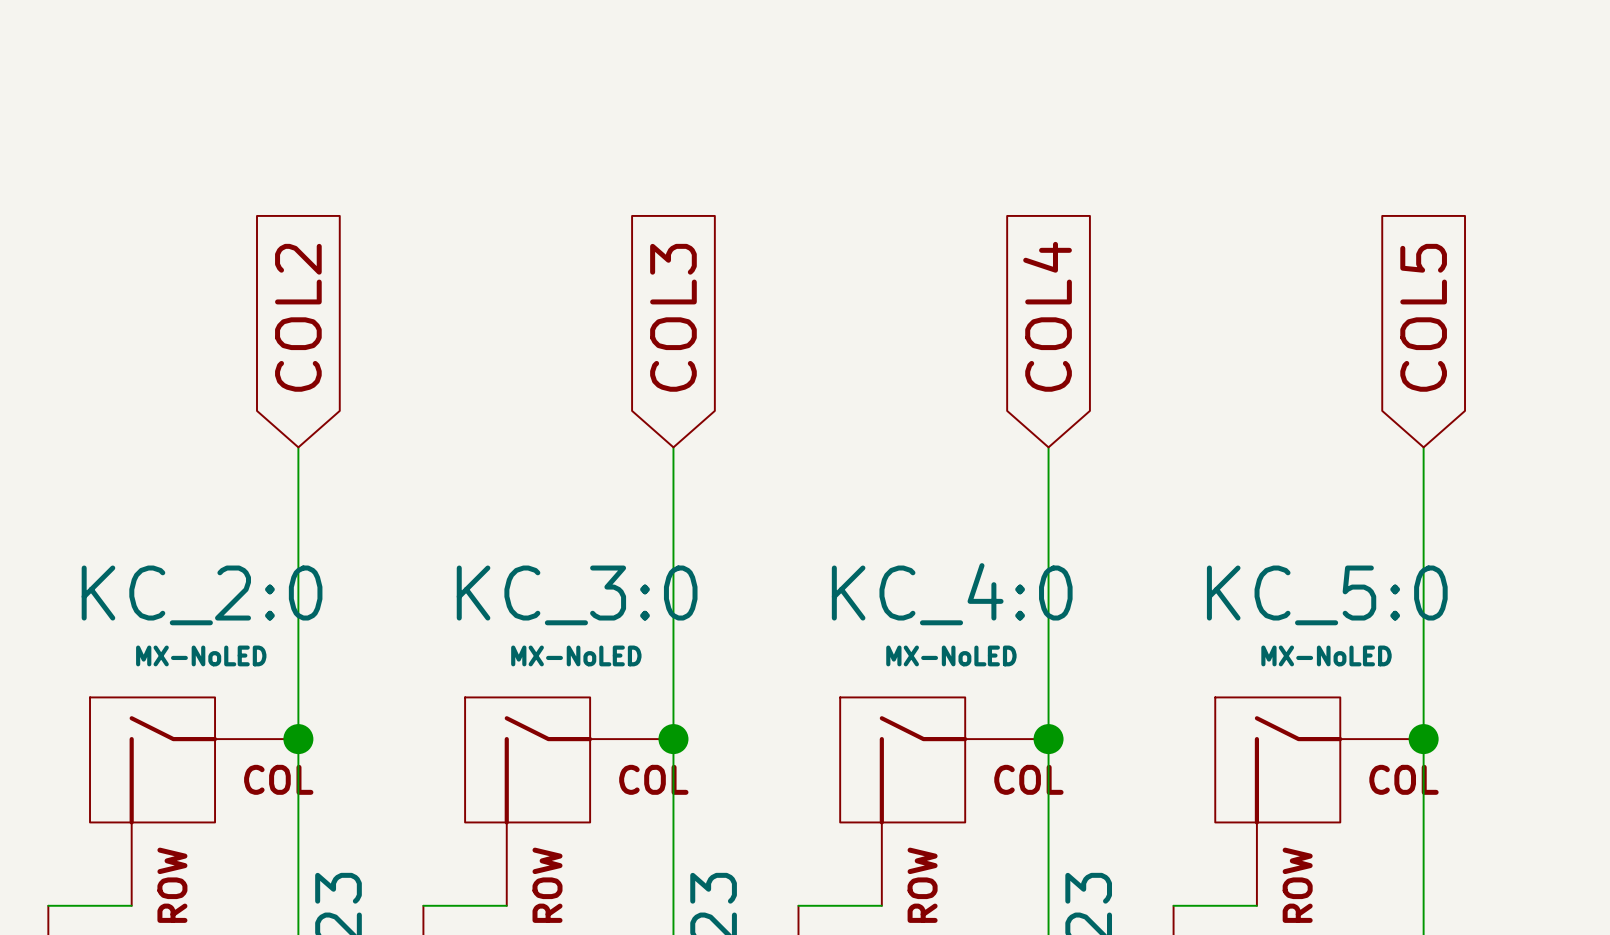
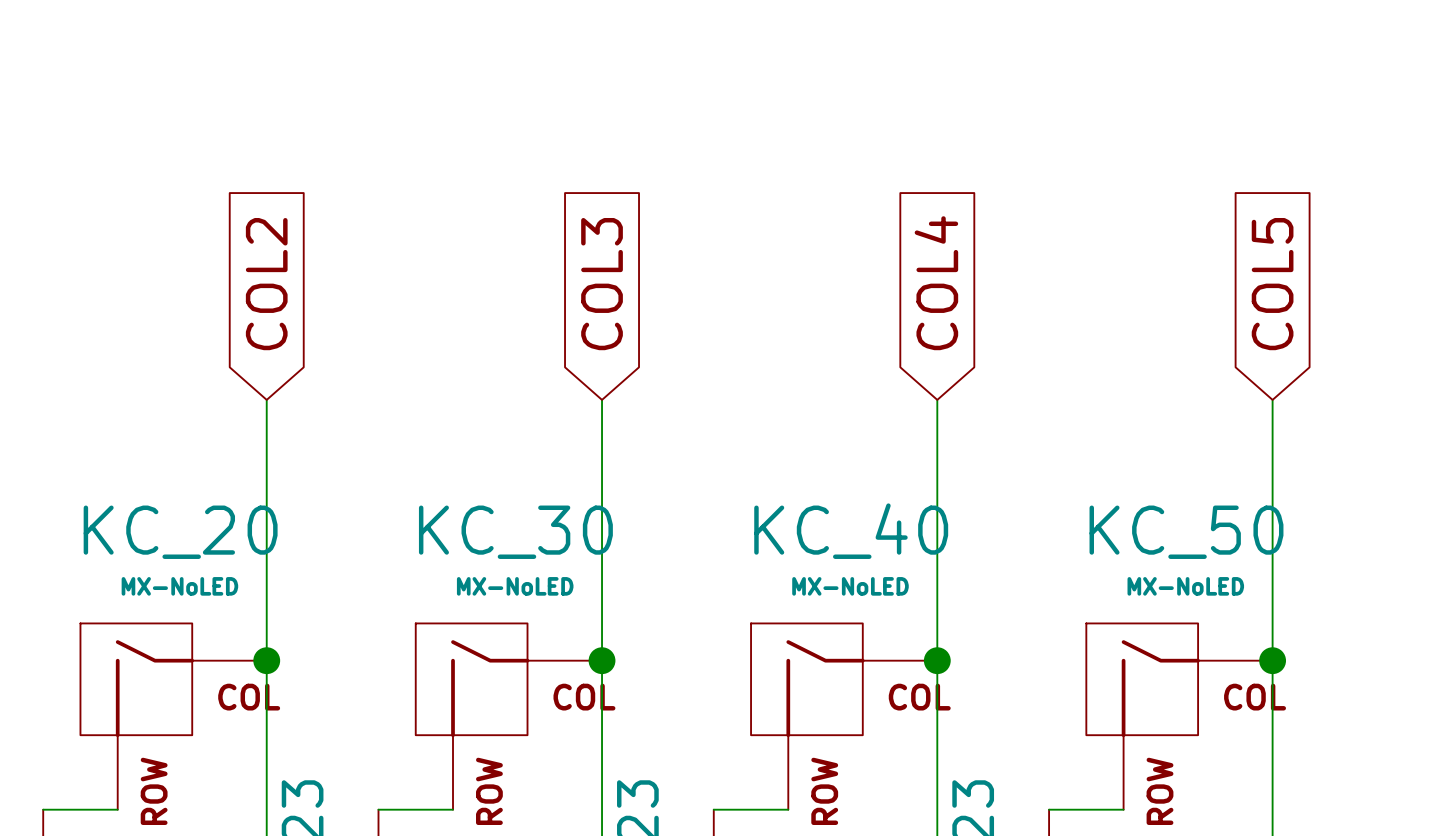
KC_40 name: KC_4:0 (952, 594) -> KC_40 (851, 531)
KC_20 name: KC_2:0 (202, 595) -> KC_20 (180, 532)
KC_30 name: KC_3:0 (577, 595) -> KC_30 (515, 532)
KC_50 name: KC_5:0 (1327, 595) -> KC_50 (1186, 532)

